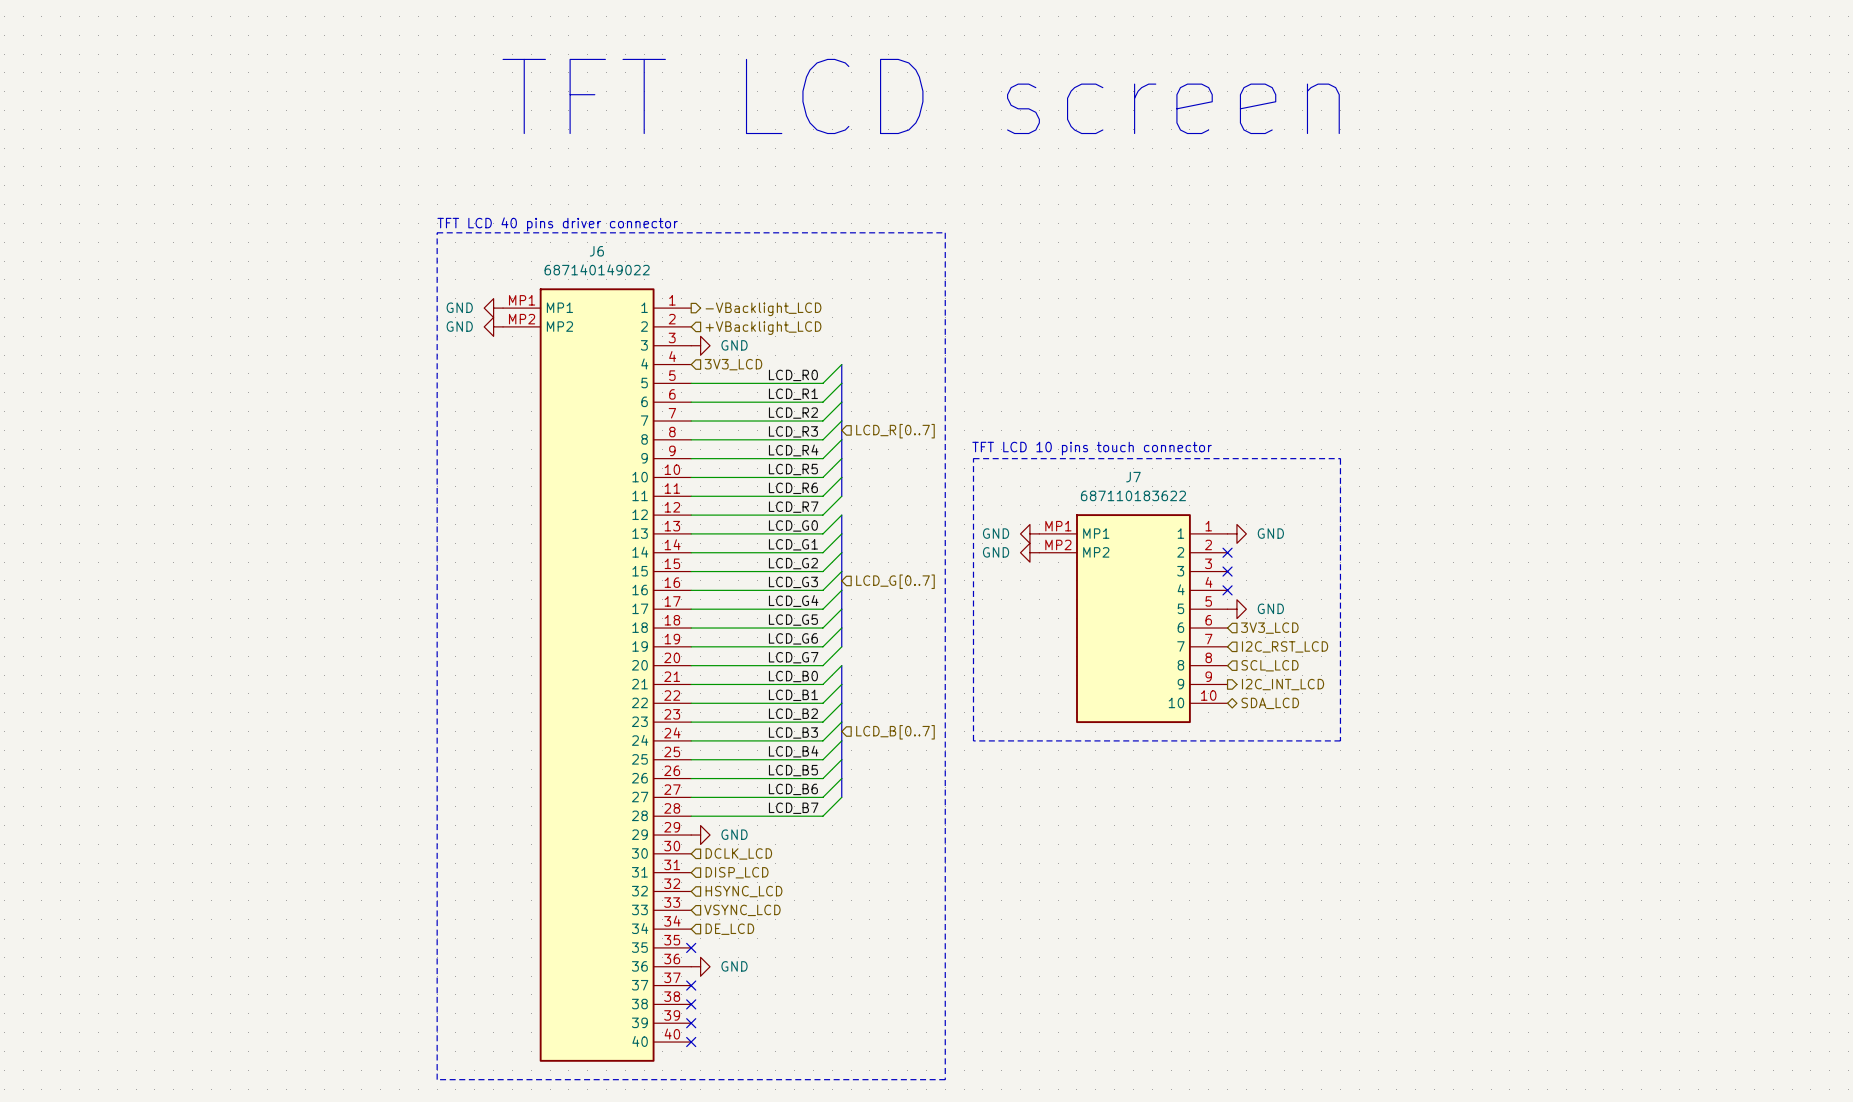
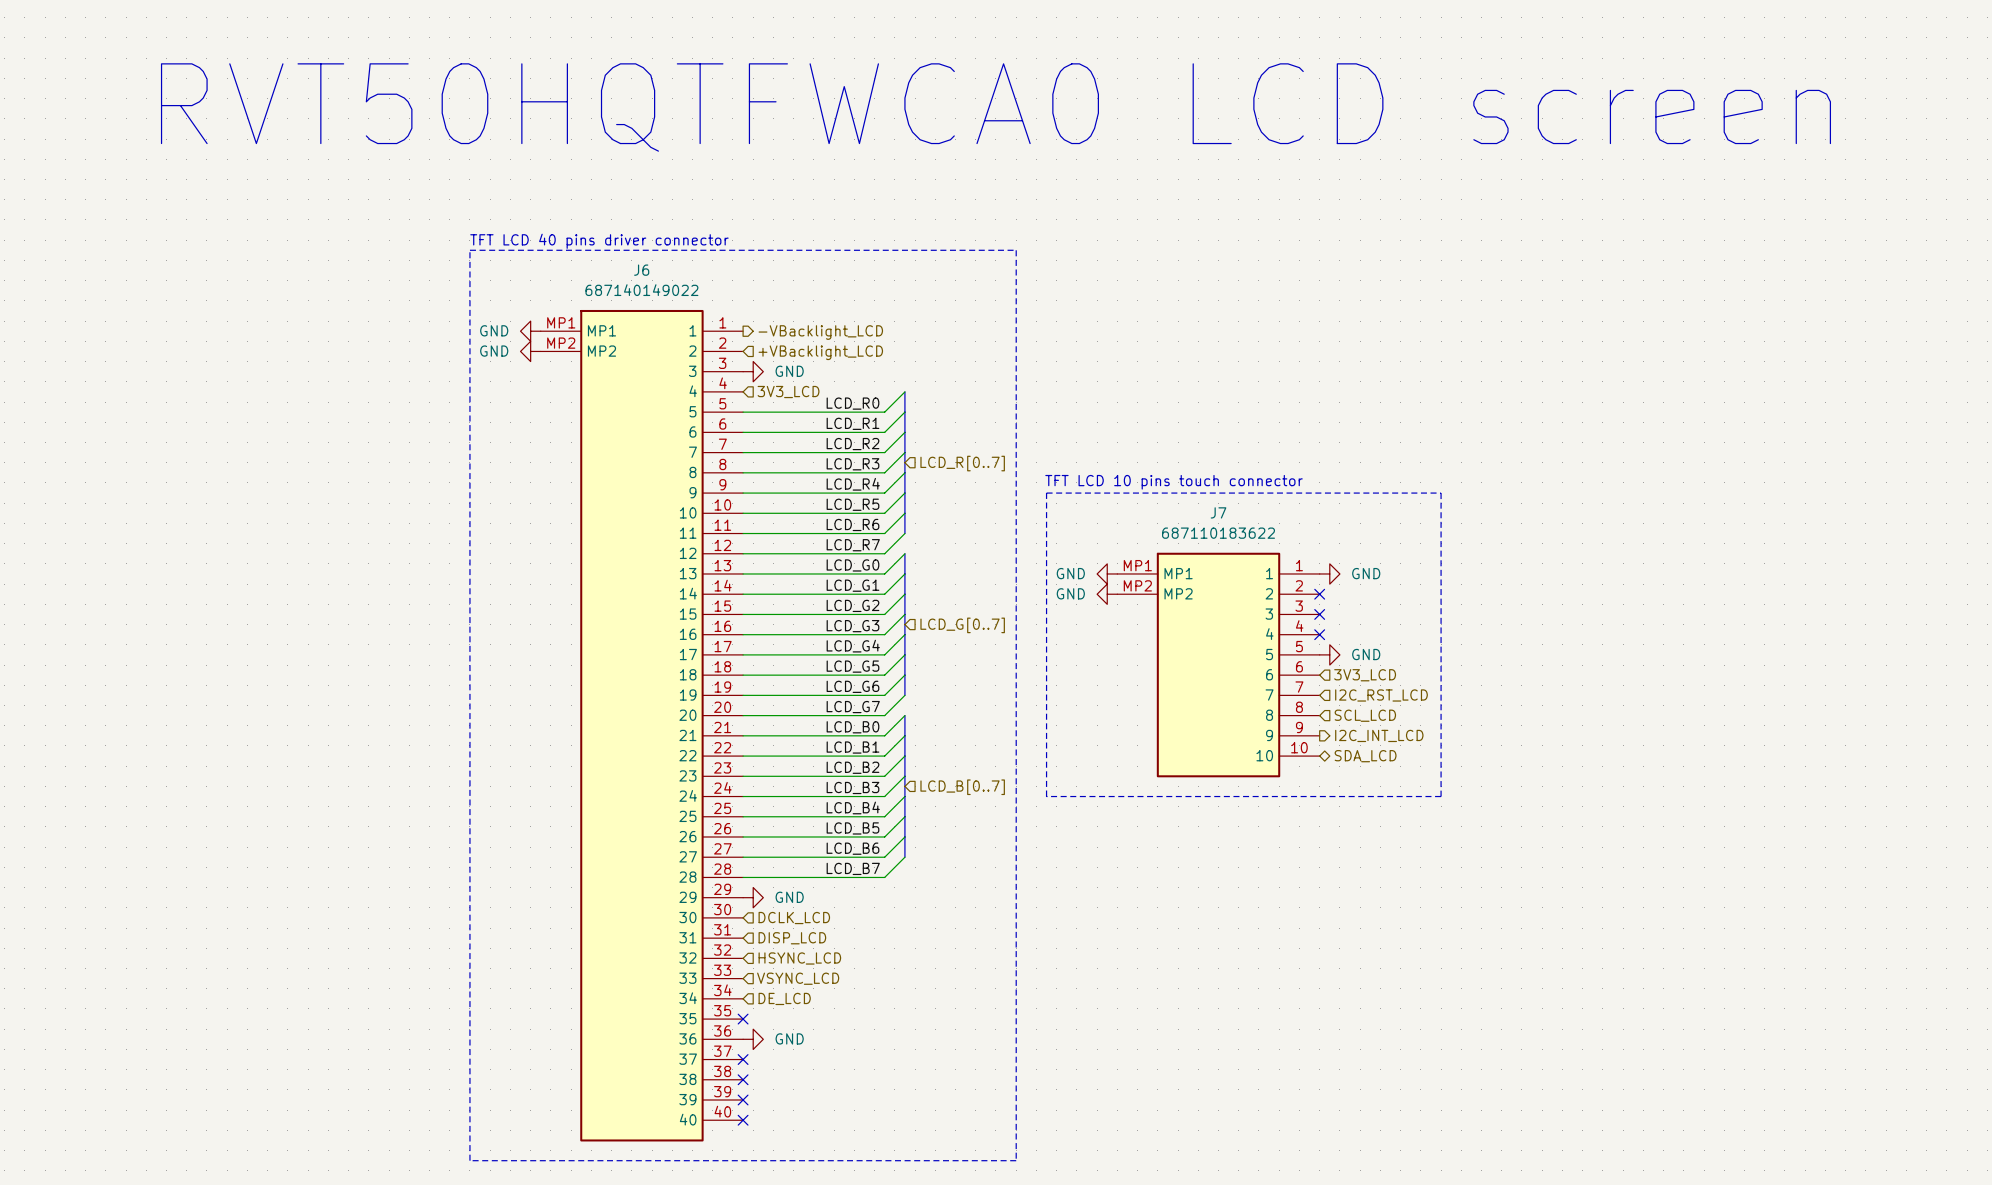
text: TFT LCD screen (921, 96) -> RVT50HQTFWCA0 LCD screen (995, 107)

